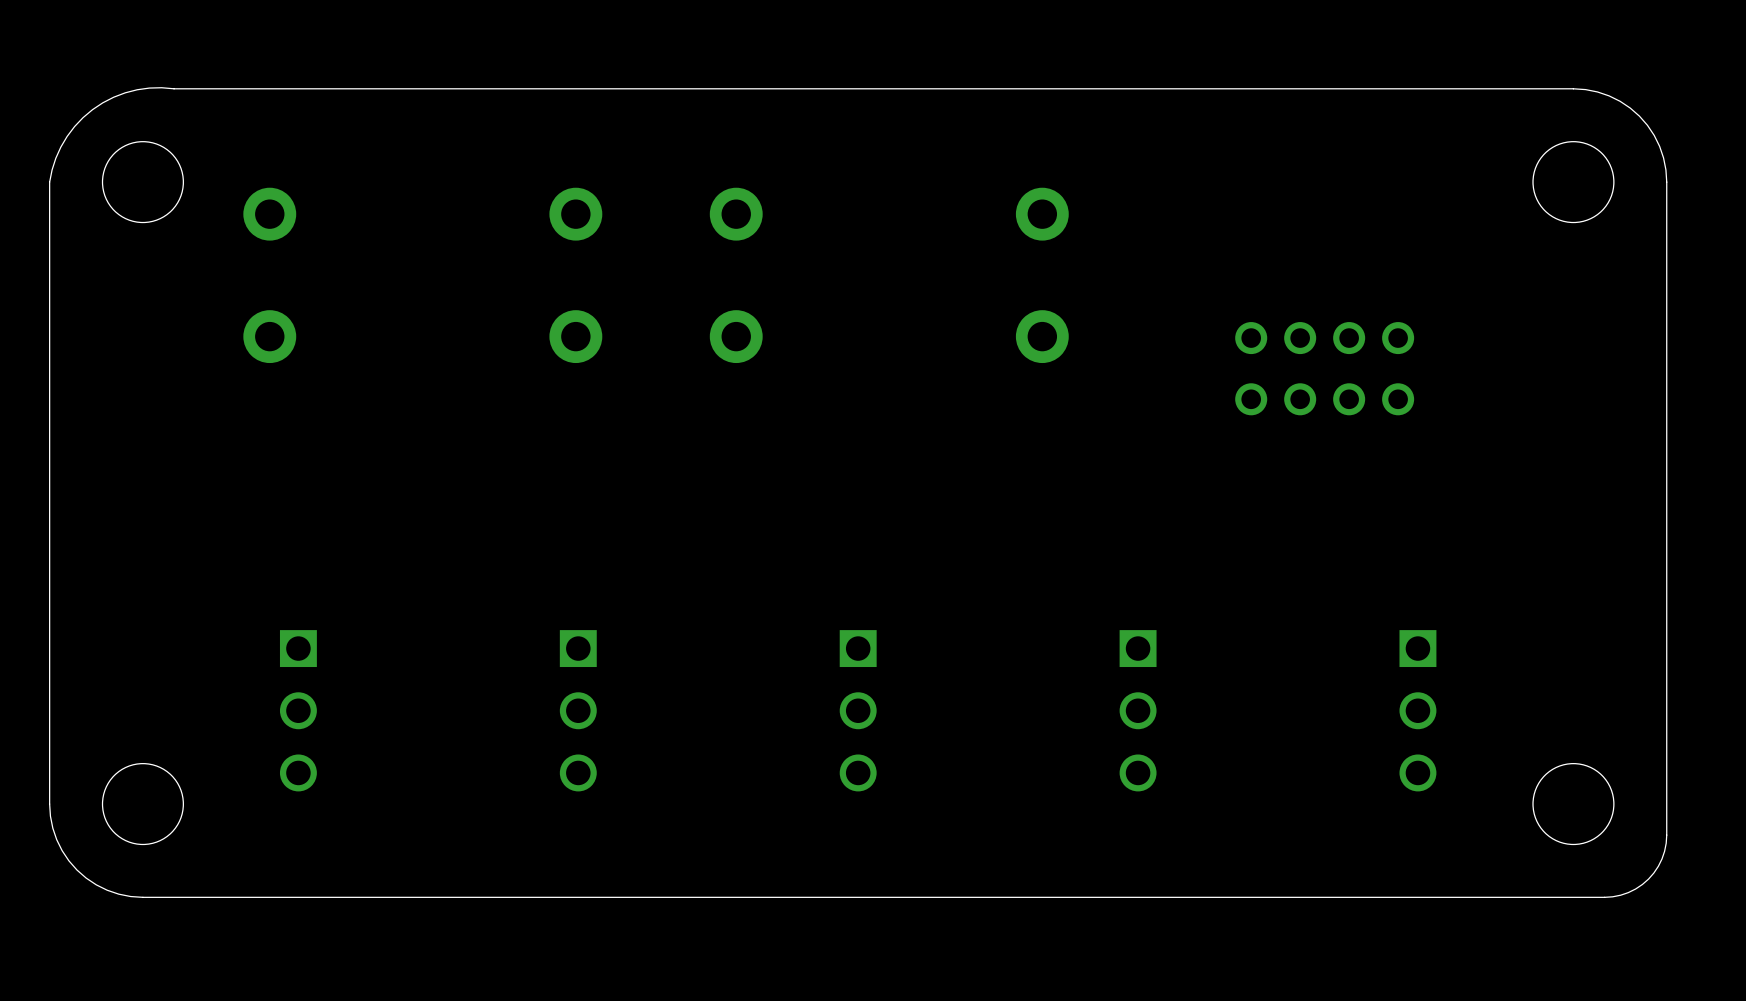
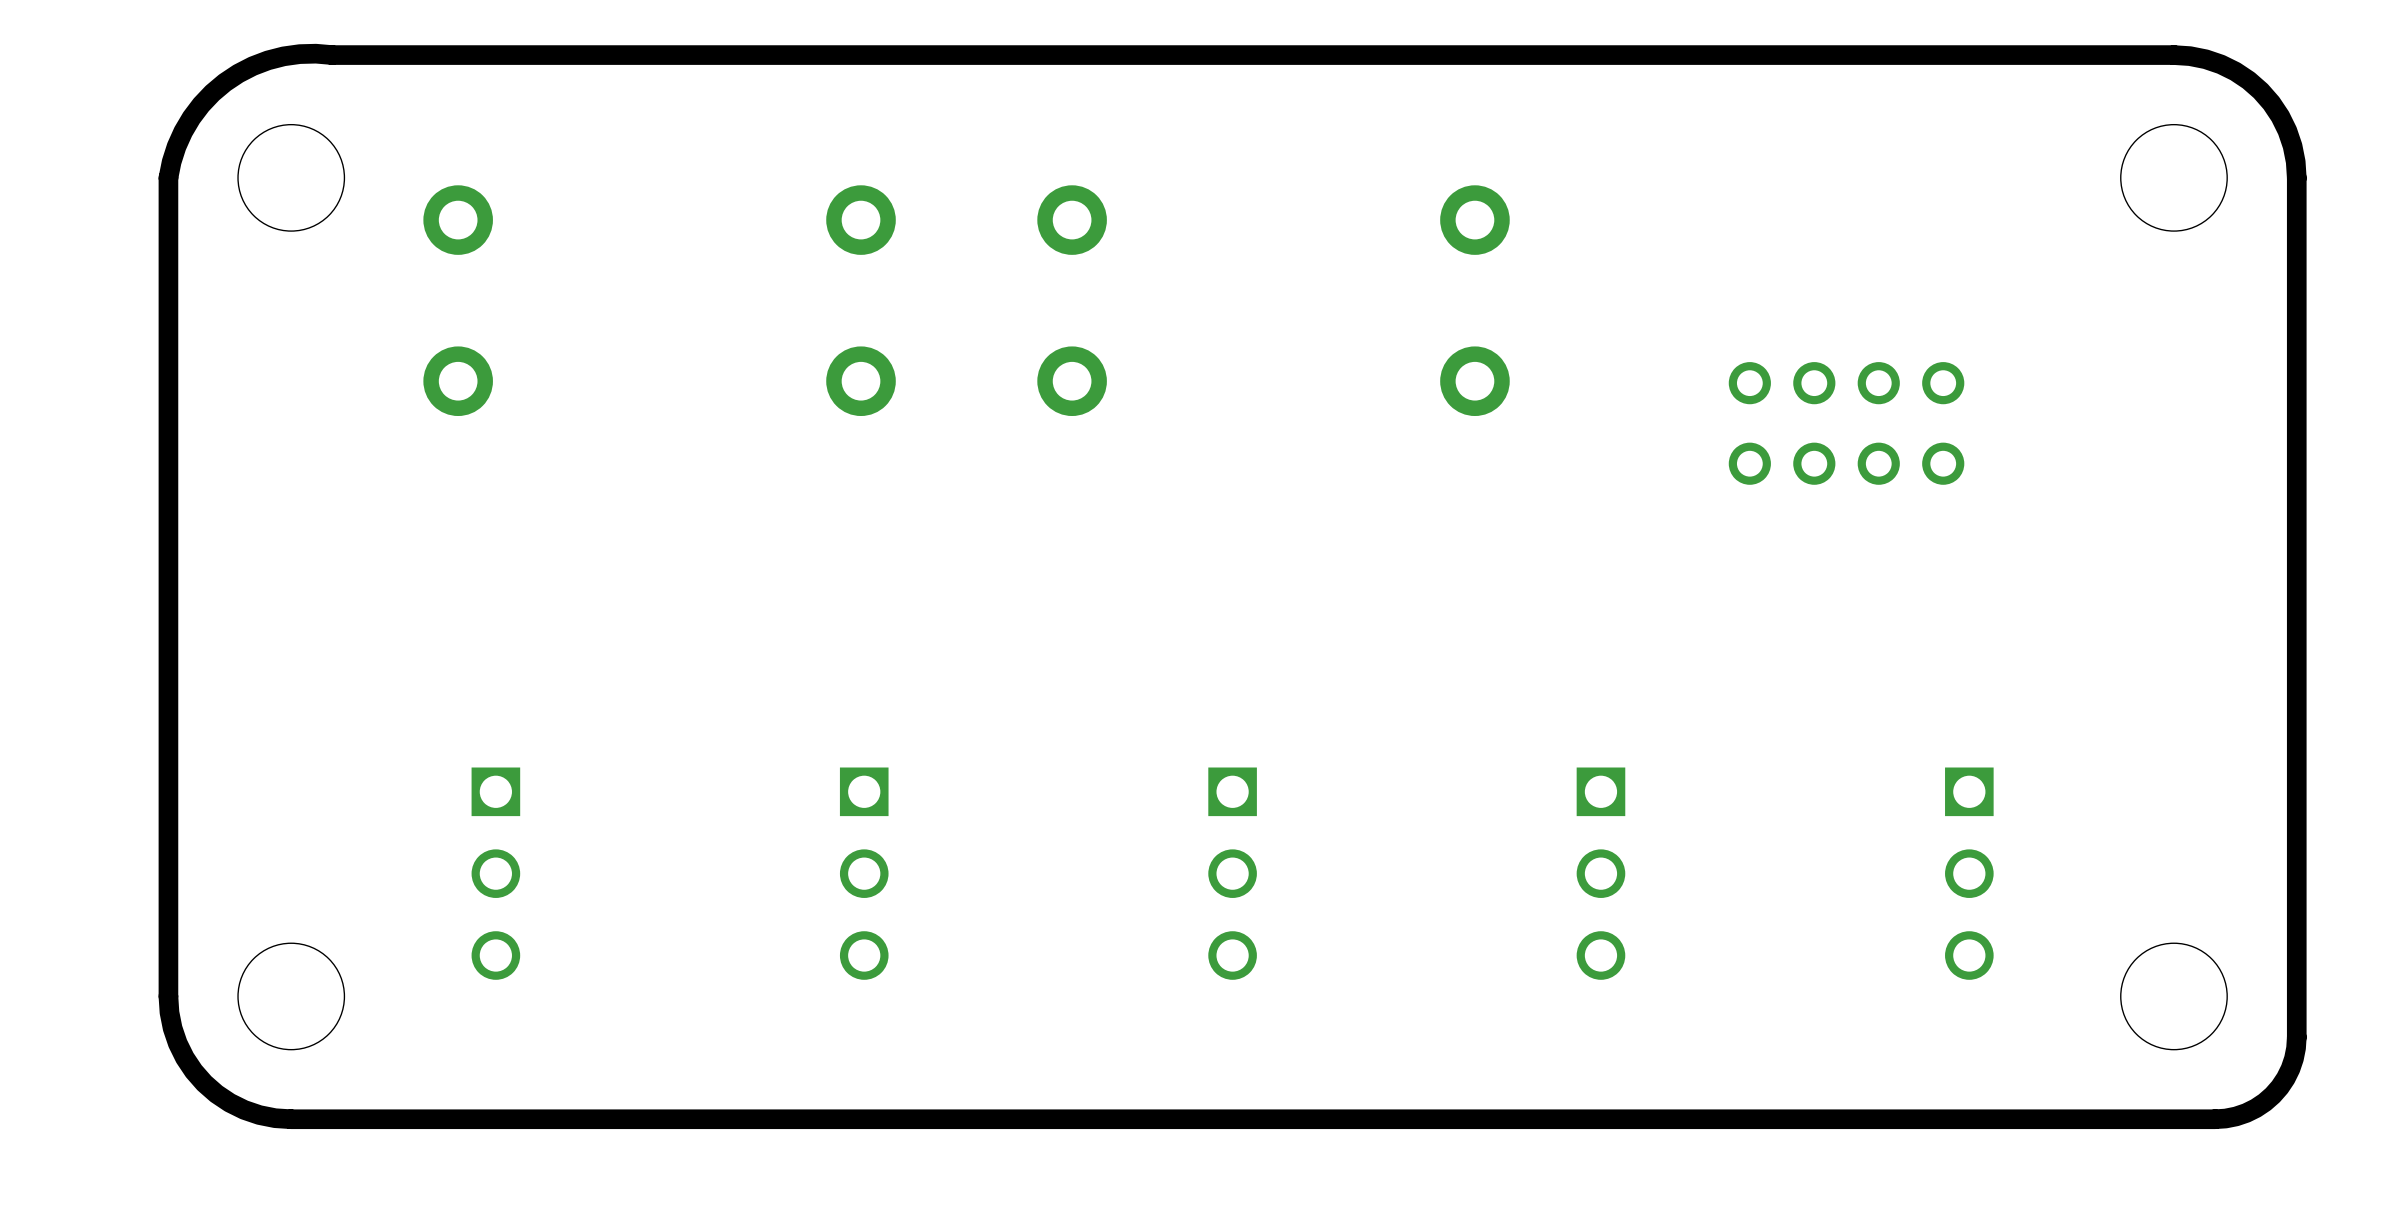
board edge width: thin (1573, 88) (161, 87) (137, 89) (113, 97) (92, 109) (74, 126) (55, 158) (49, 182) (49, 804) (52, 828) (62, 850) (76, 870) (96, 884) (118, 894) (142, 897) (1604, 897) (1620, 895) (1635, 889) (1648, 879) (1658, 866) (1664, 851) (1666, 835) (1665, 169) (1663, 157) (1654, 135) (1639, 116) (1620, 101) (1609, 95) (1597, 91) (1573, 88) -> thick (2173, 55) (315, 53) (283, 56) (252, 66) (224, 82) (201, 104) (191, 117) (176, 146) (168, 177) (168, 996) (172, 1028) (184, 1057) (204, 1083) (229, 1102) (259, 1115) (291, 1119) (2214, 1119) (2236, 1116) (2255, 1108) (2272, 1095) (2285, 1078) (2293, 1058) (2296, 1037) (2295, 161) (2292, 146) (2280, 116) (2260, 91) (2235, 71) (2220, 64) (2205, 59) (2173, 55)

